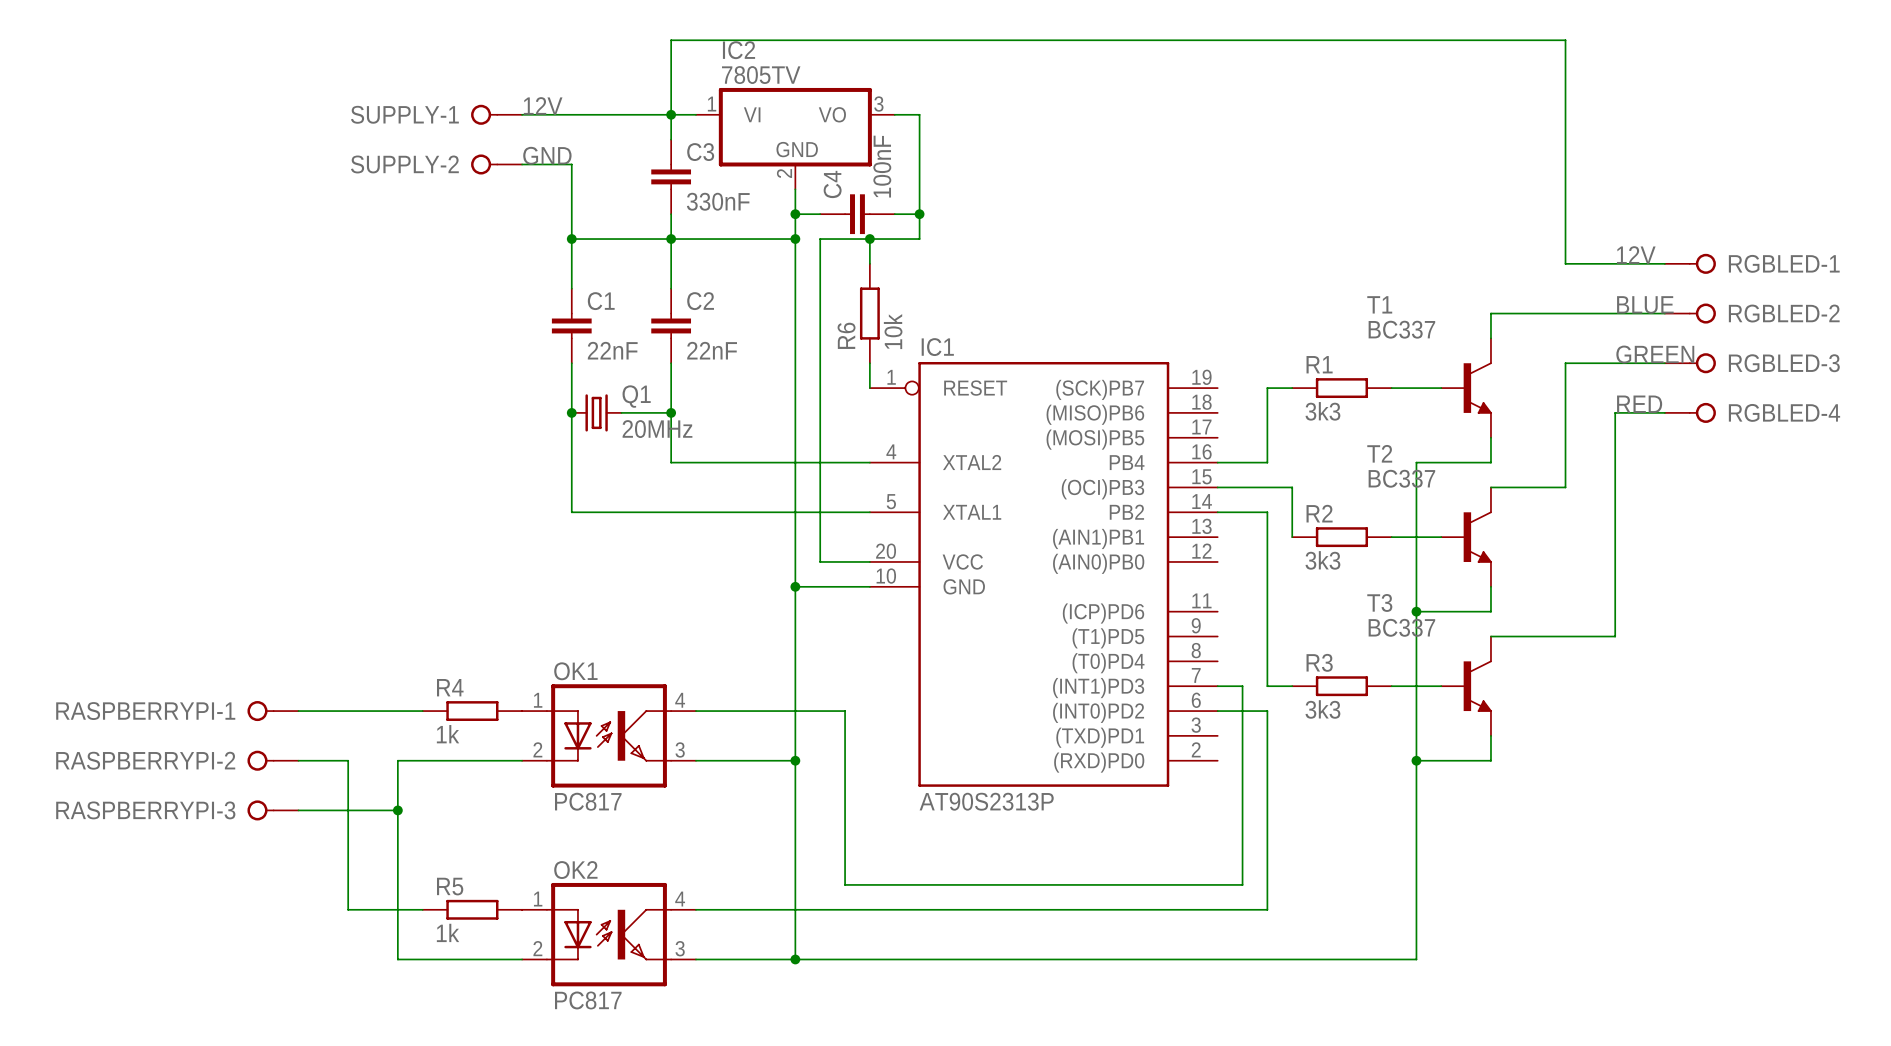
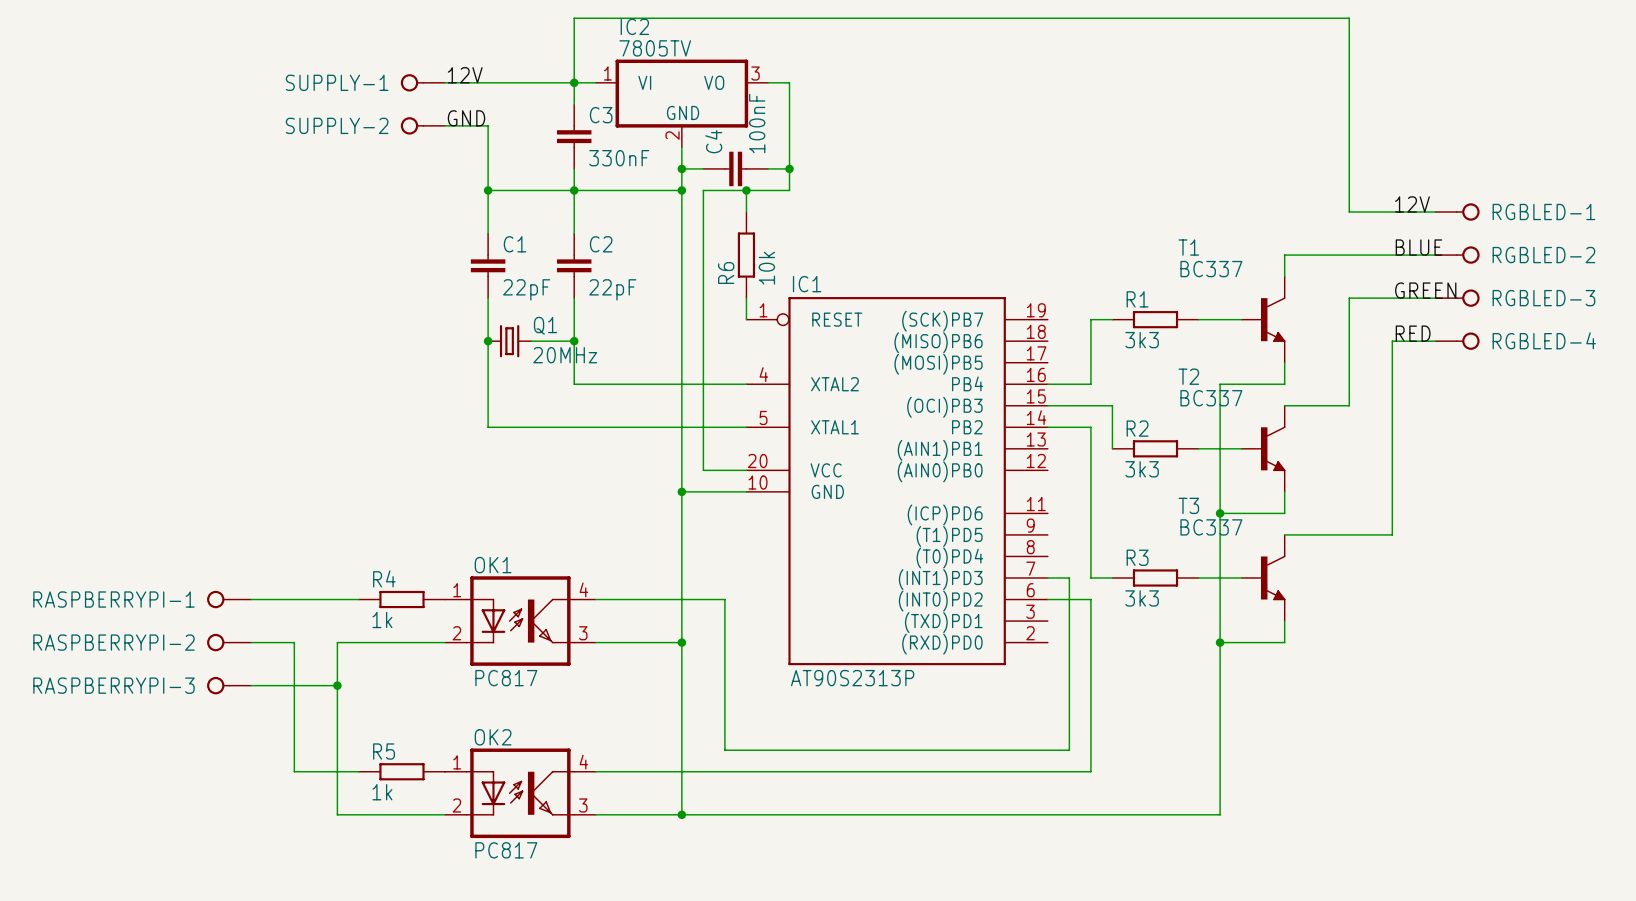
C1 value: 22nF (612, 350) -> 22pF (526, 289)
C2 value: 22nF (712, 350) -> 22pF (612, 289)

